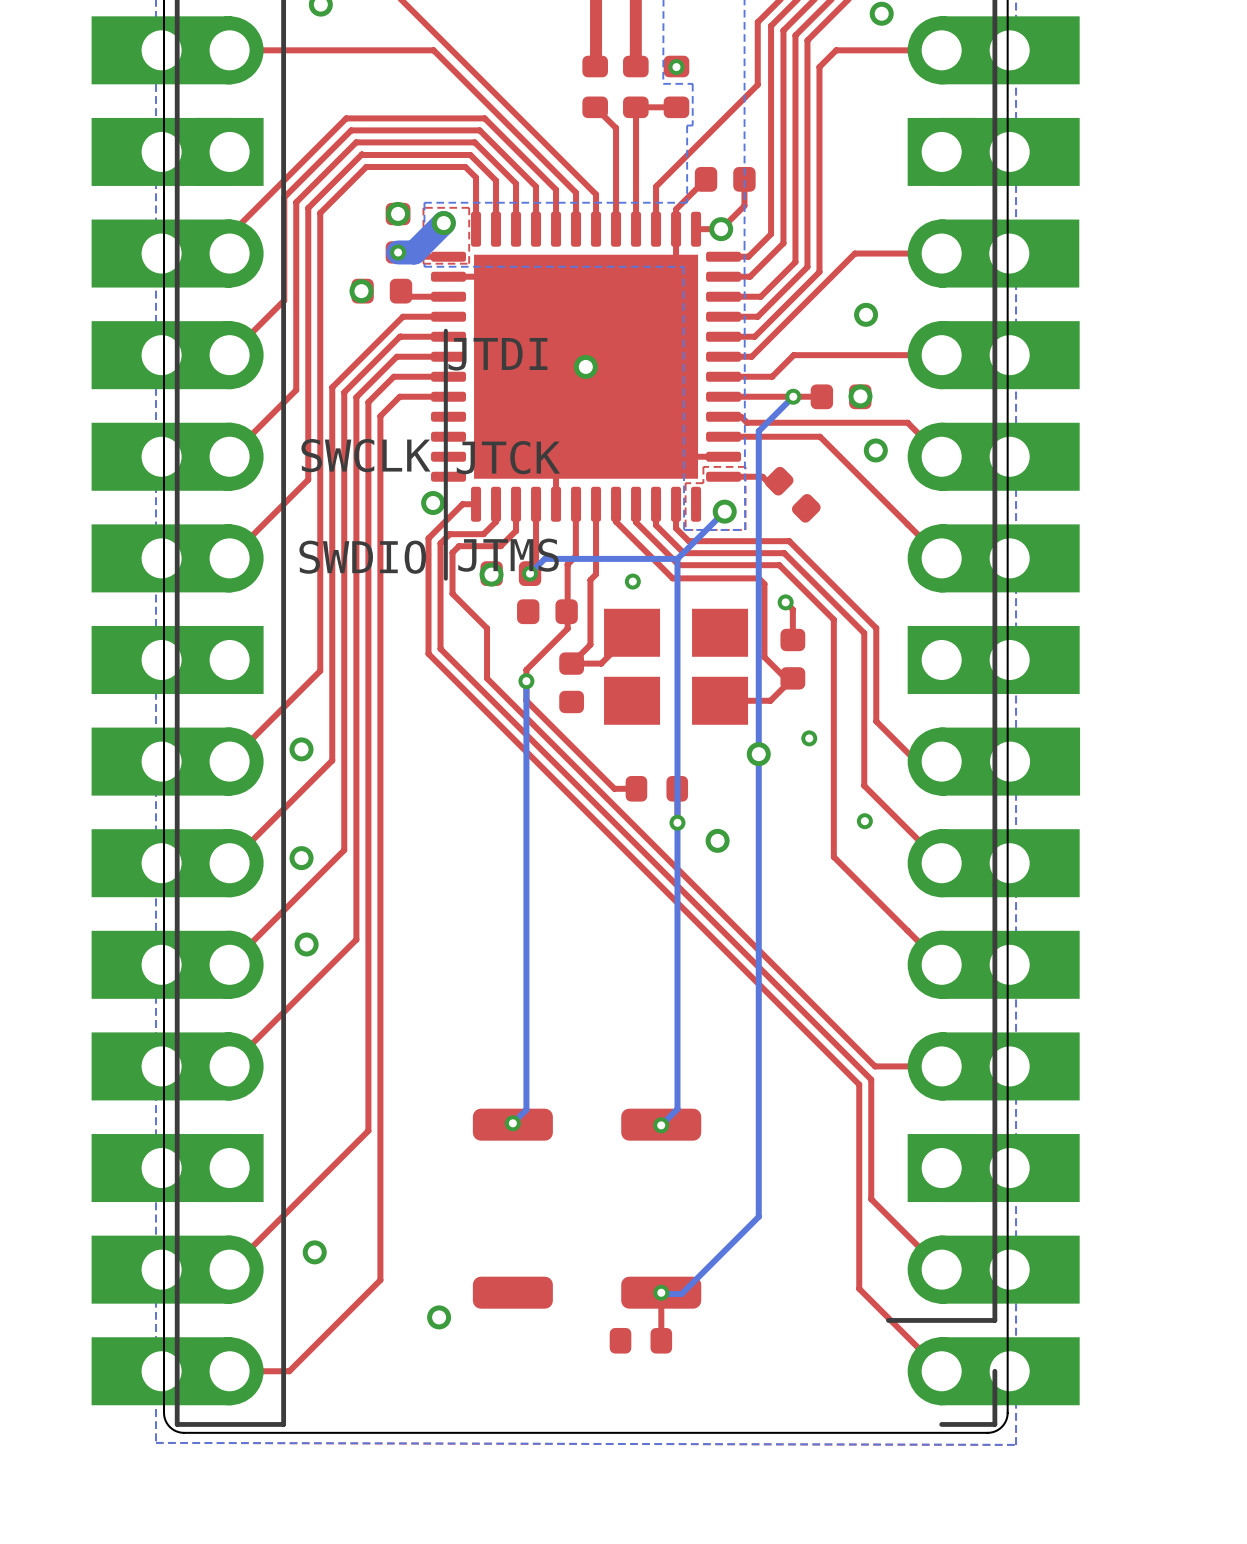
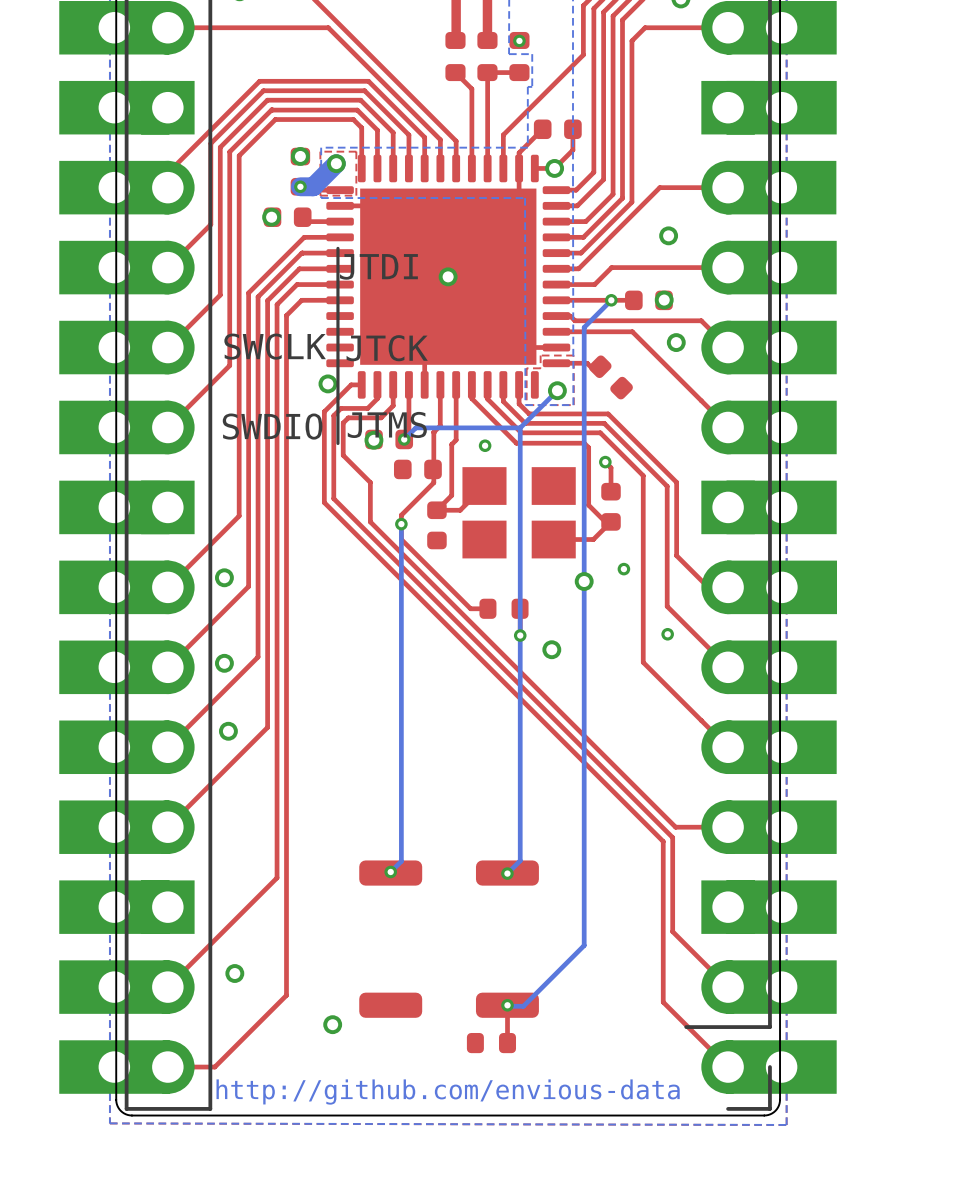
text: none -> http://github.com/envious-data (448, 1092)

